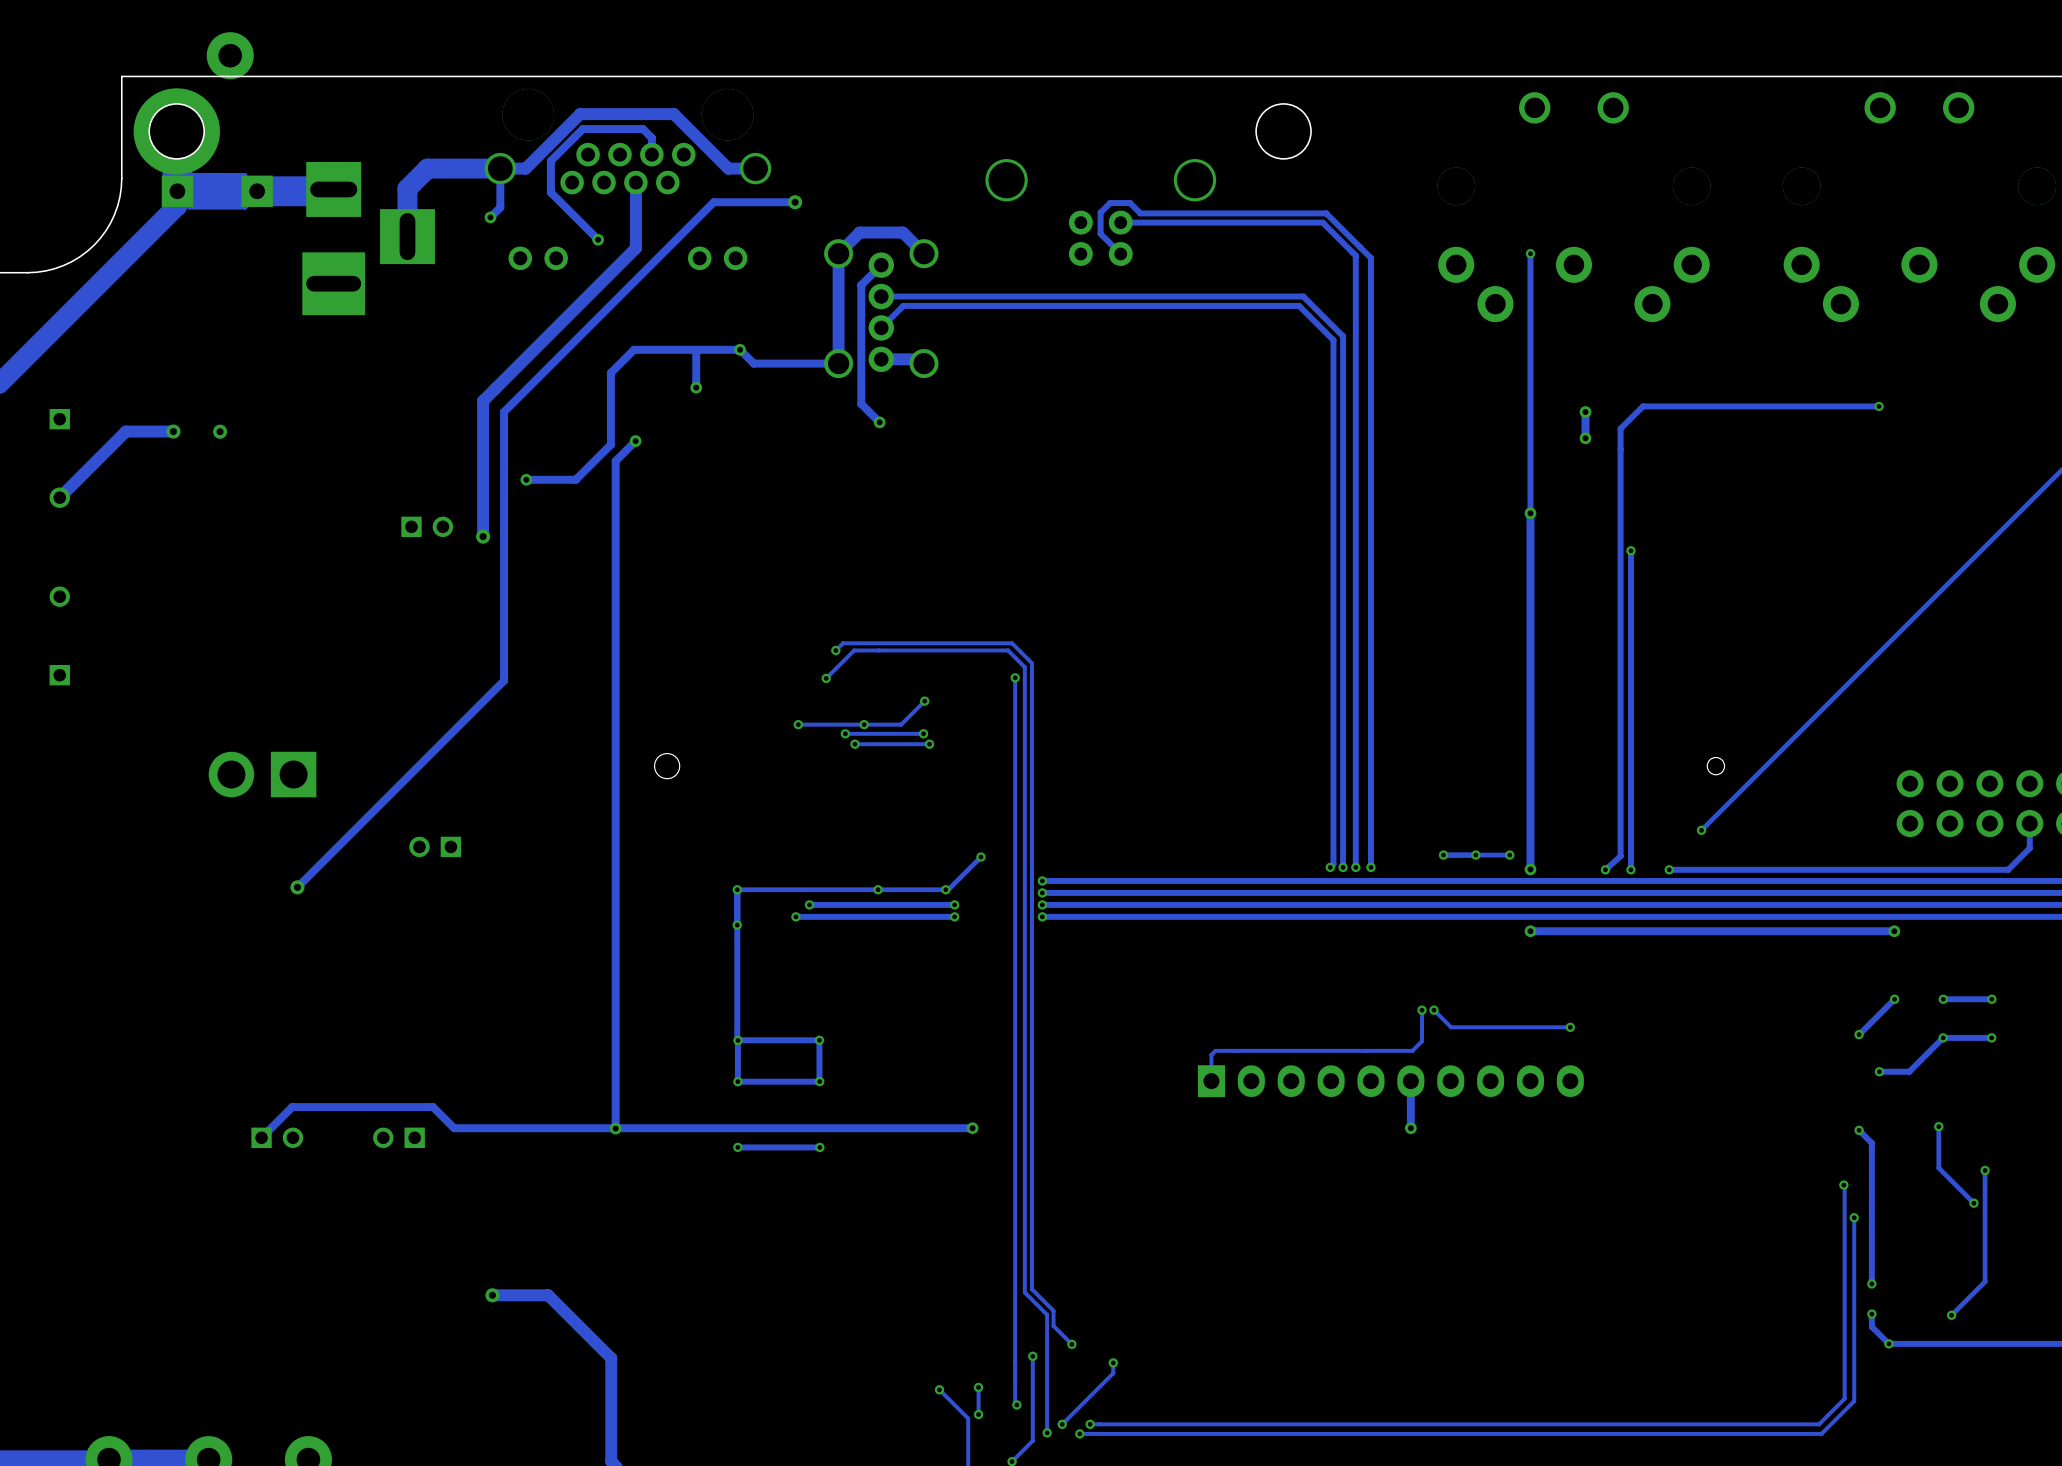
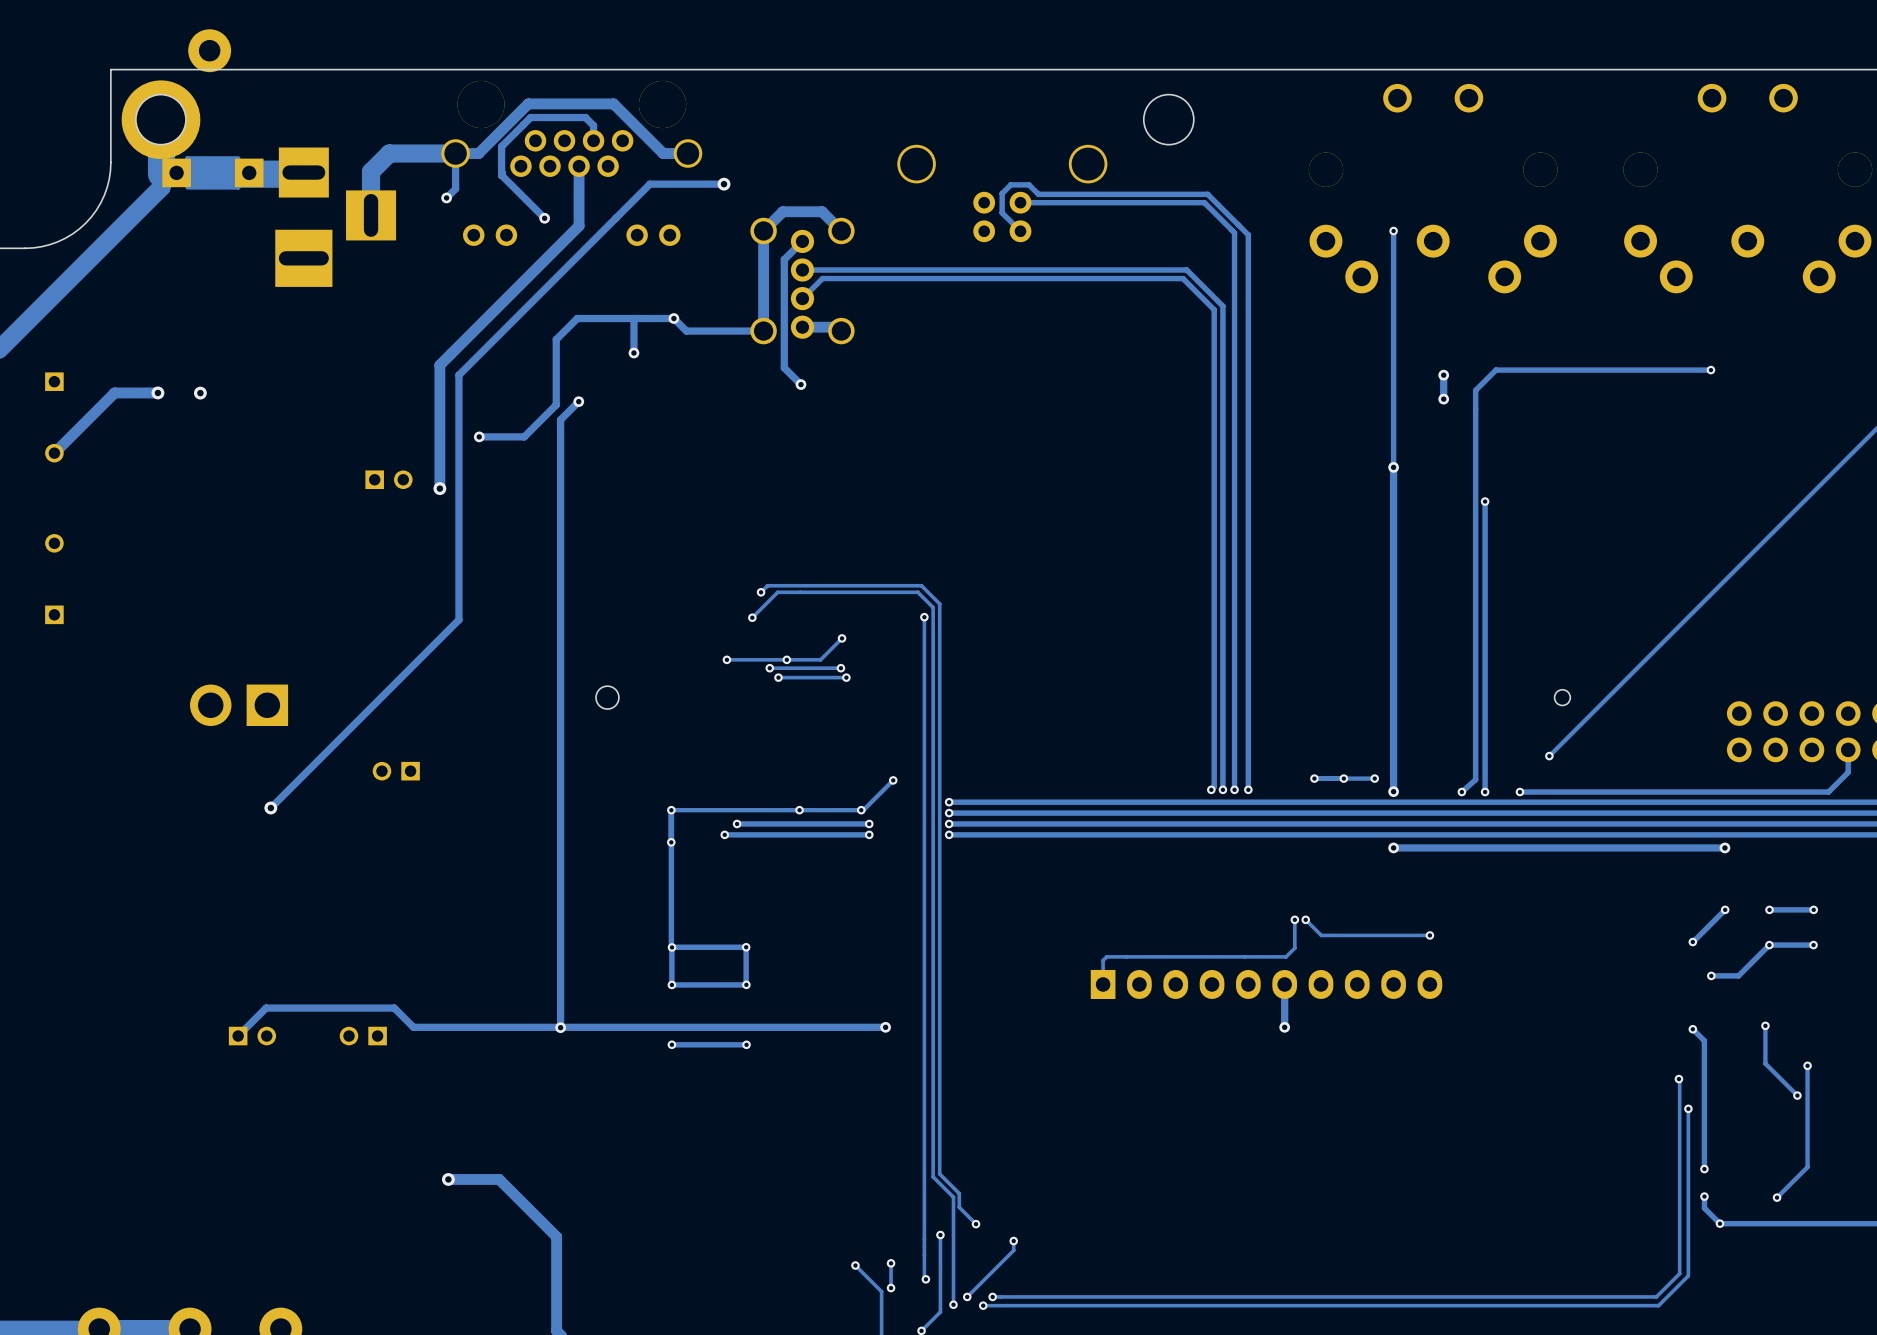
part position: (217, 191) -> (212, 172)

